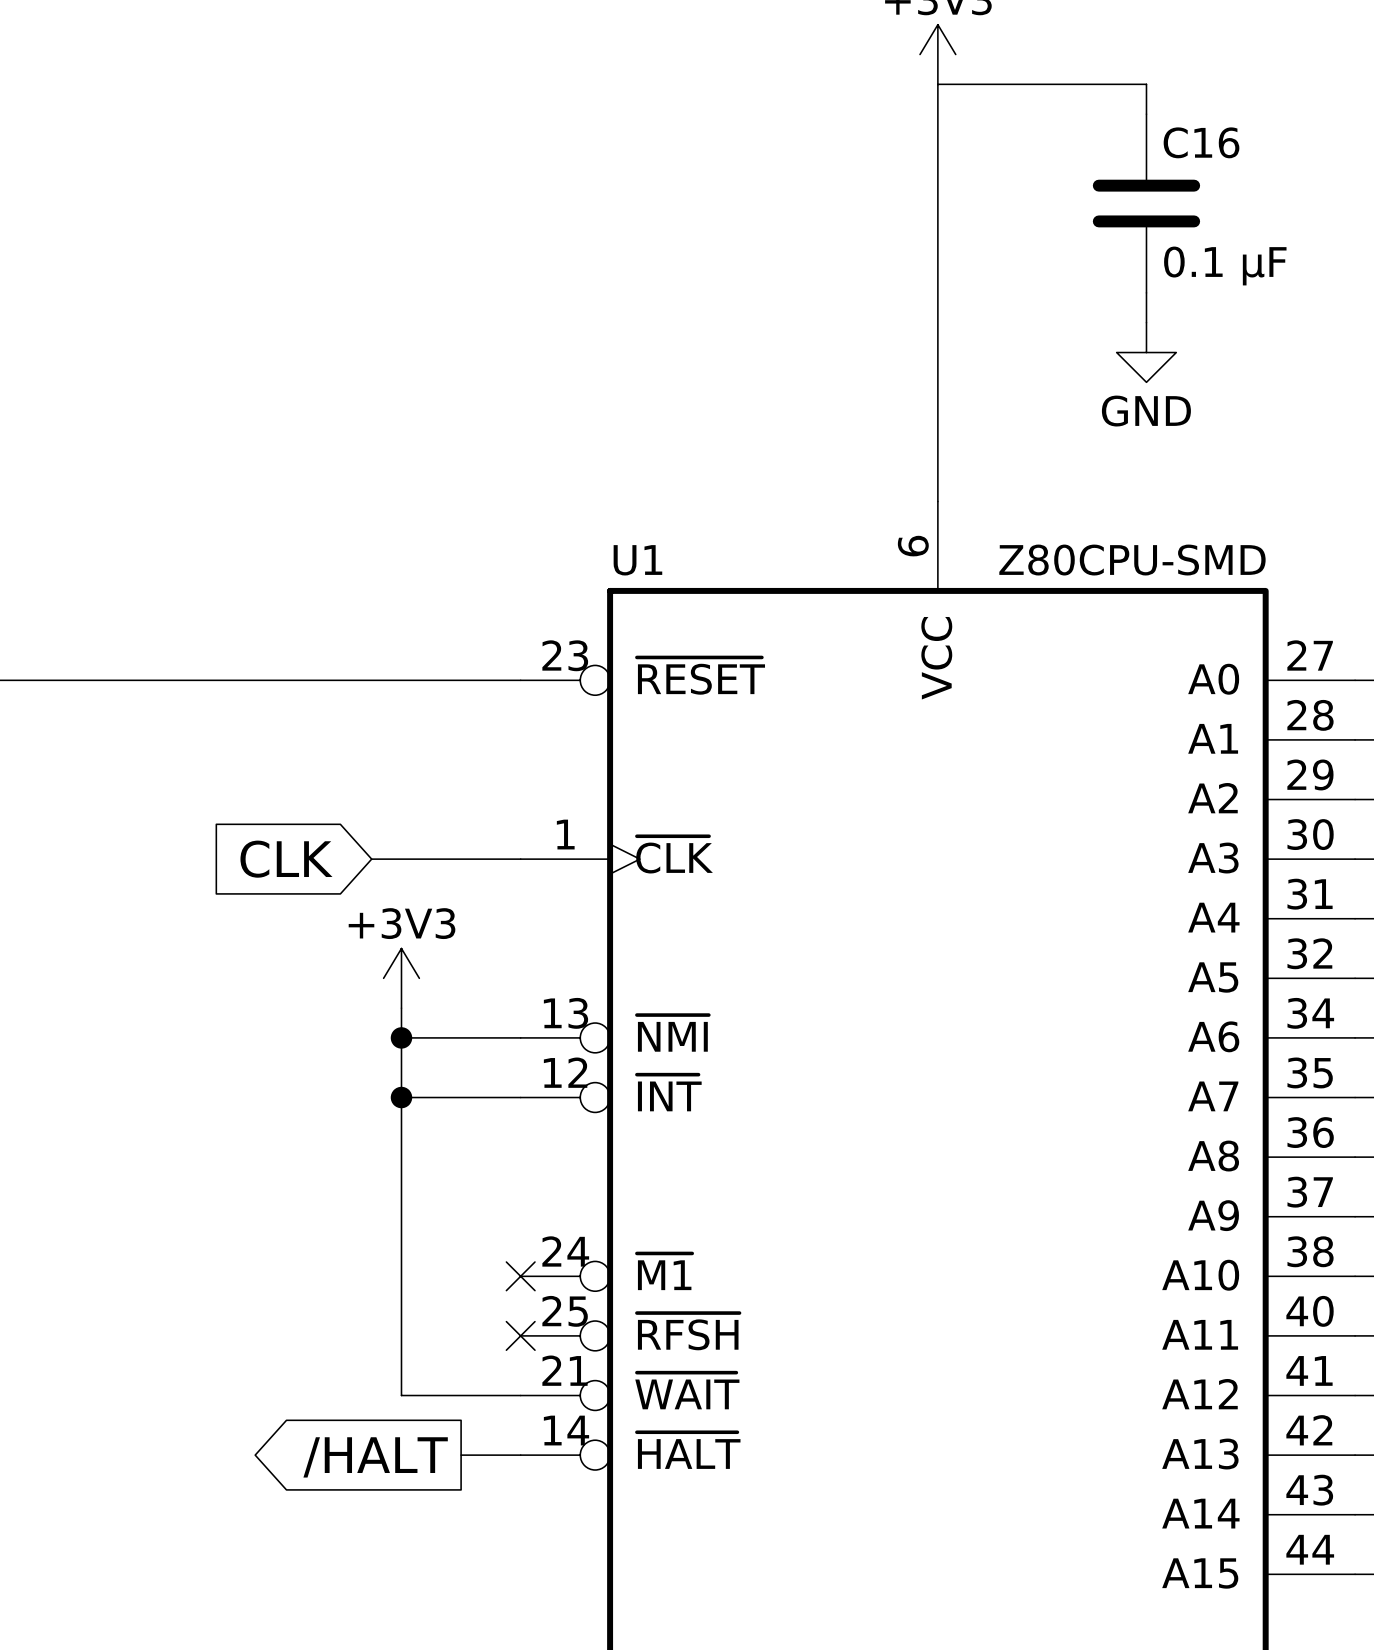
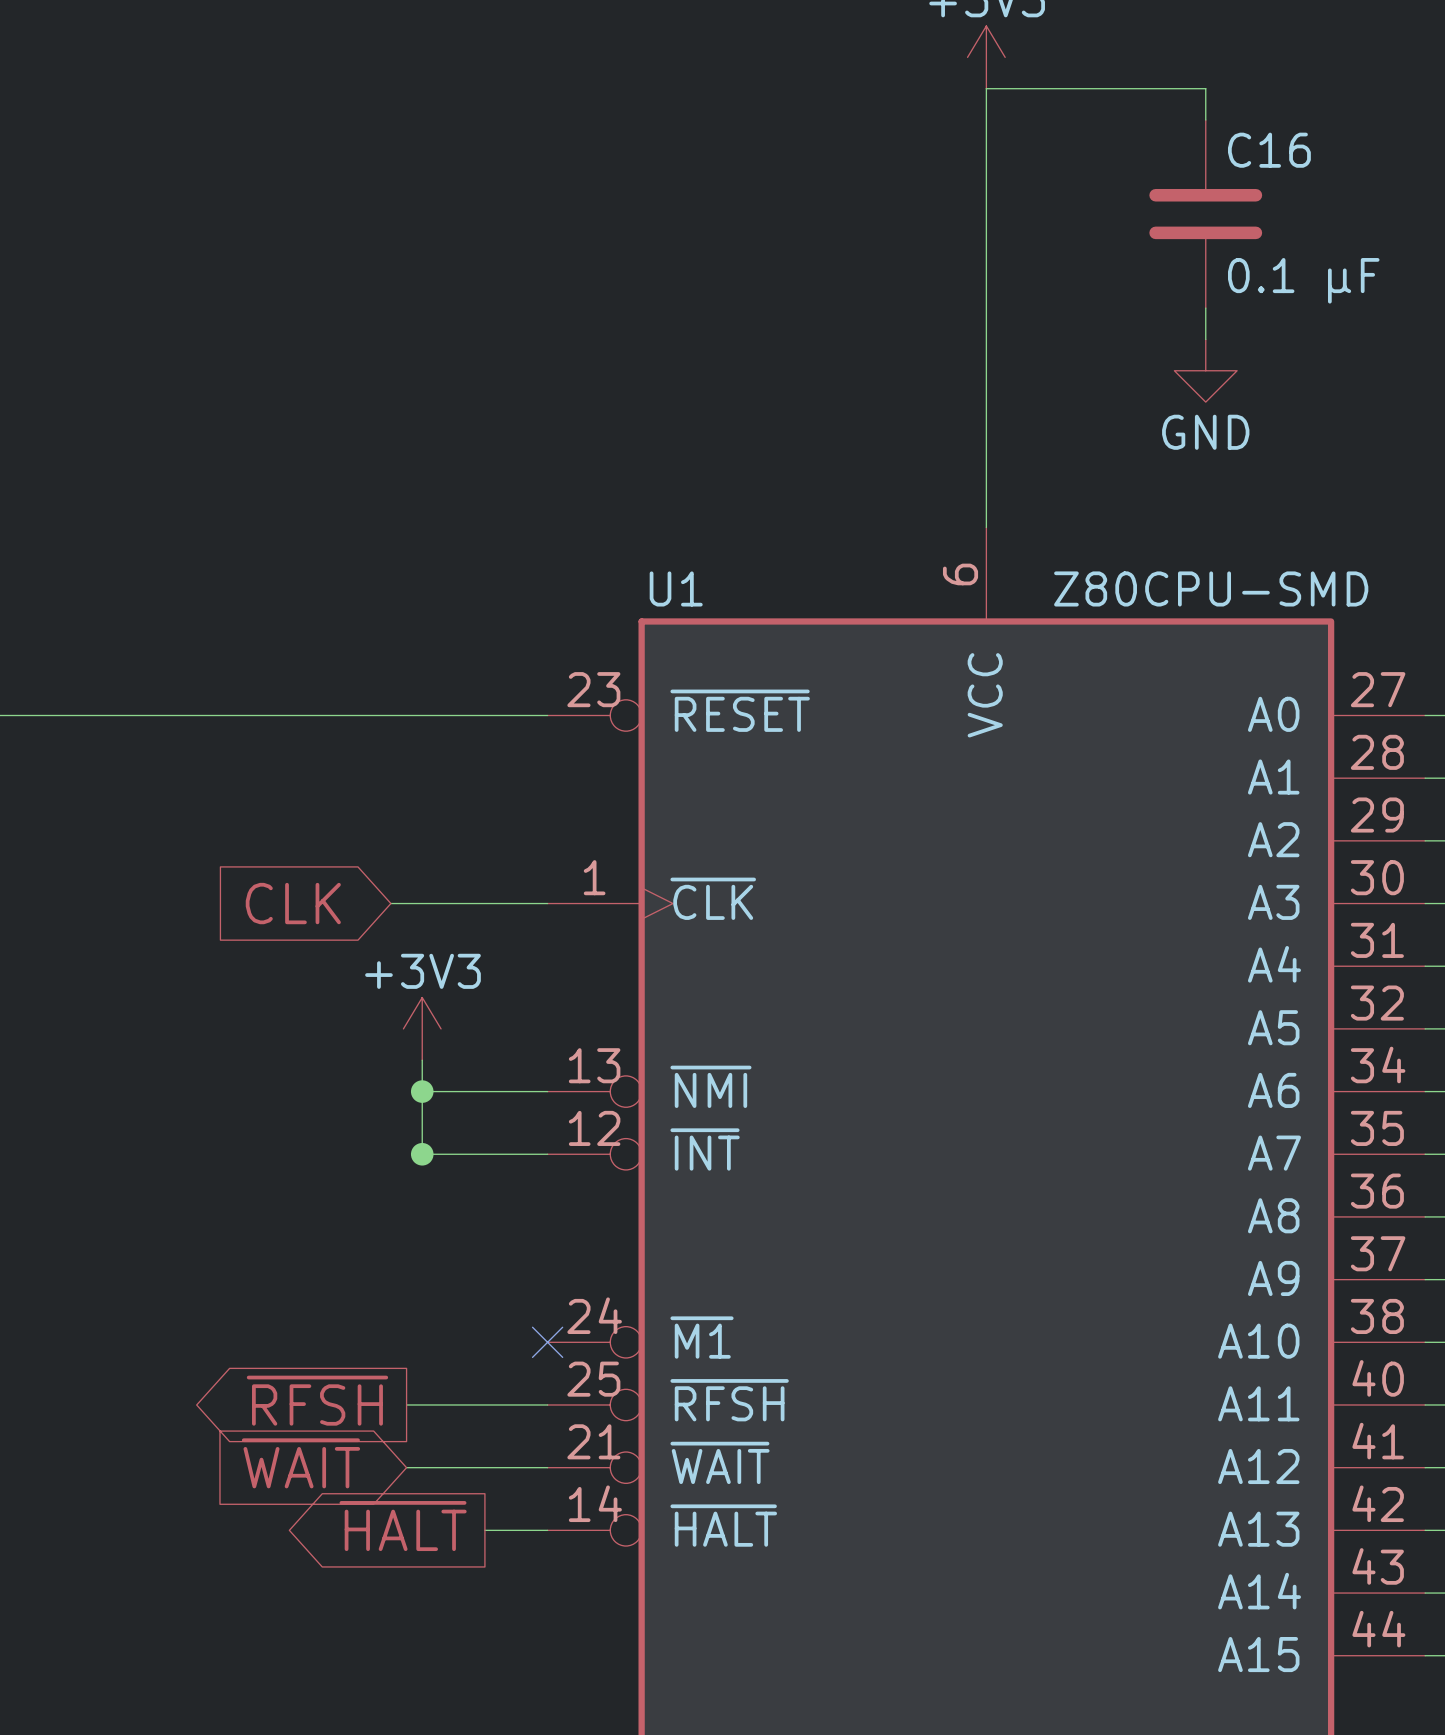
wire: (401, 1097) (401, 1395) -> (406, 1467) (422, 1467)
global label: none -> ~{RFSH} (317, 1400)
wire: none -> (406, 1404) (547, 1404)
no-connect mark: (520, 1335) -> none
global label: none -> ~{WAIT} (300, 1463)
global label: /HALT (375, 1457) -> ~{HALT} (403, 1526)

